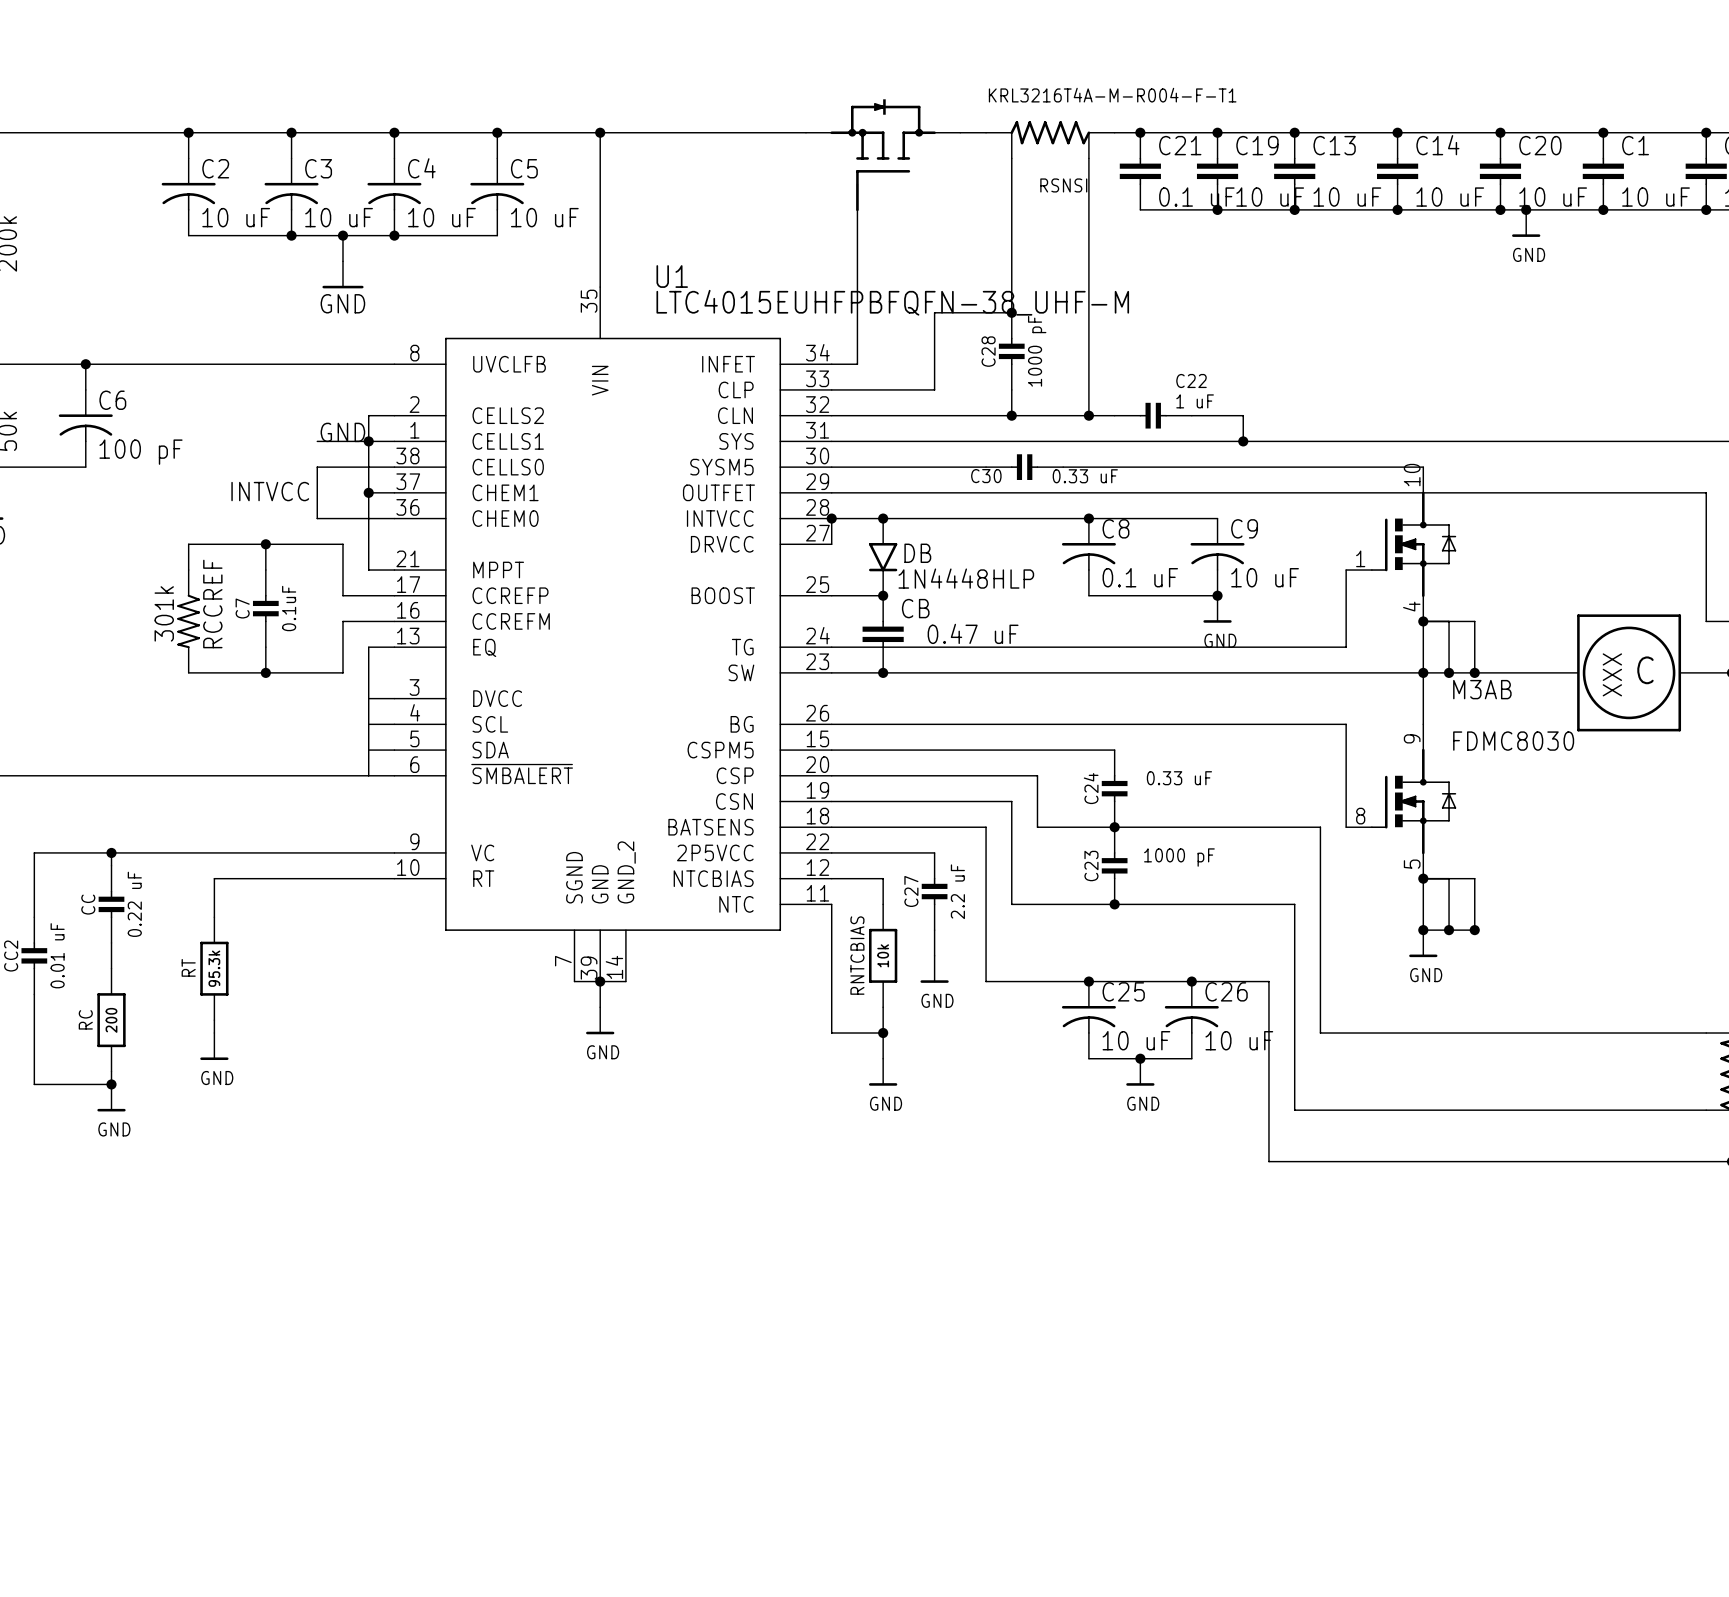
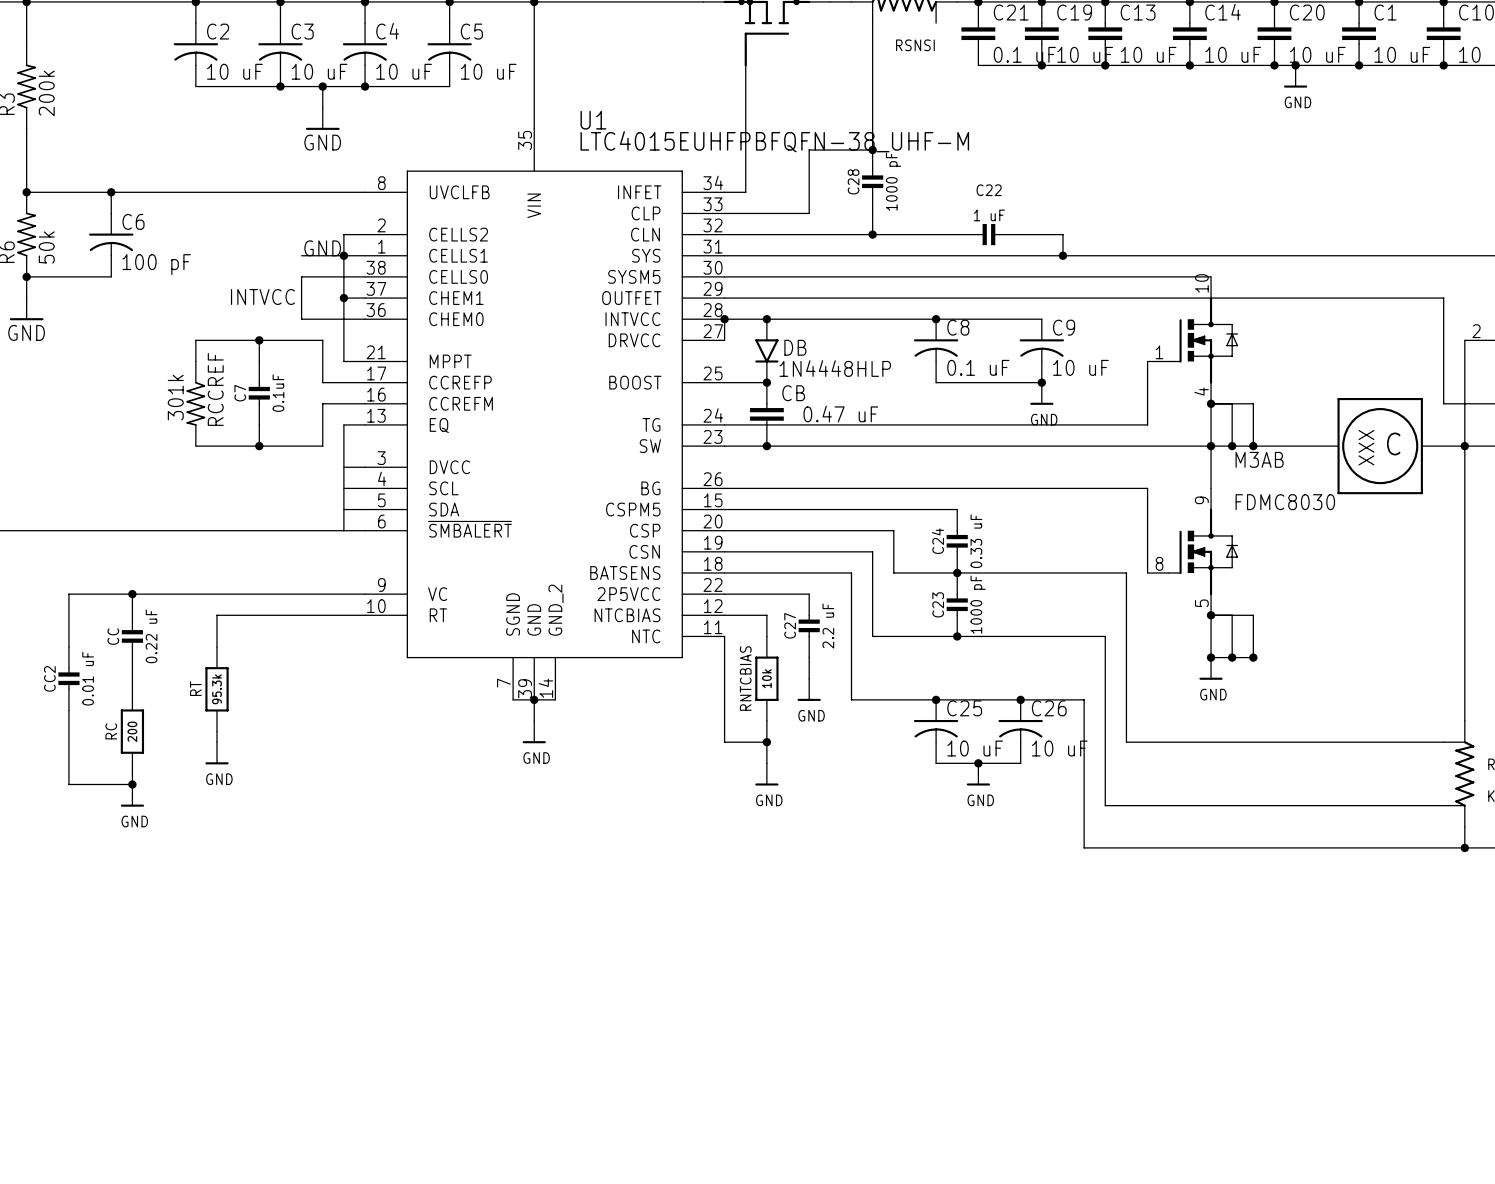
wire: (1088, 158) (1088, 415) -> none
C22 name position: C22 (1191, 380) -> C22 (989, 190)
C22 value position: 1 uF (1195, 401) -> 1 uF (989, 215)
junction: (1088, 415) -> none
C30: 0.33 uF (1024, 467) -> none
C24 value rotation: 0° (1179, 778) -> 90° counterclockwise (976, 541)
C23 value rotation: 0° (1179, 857) -> 90° counterclockwise (978, 604)

